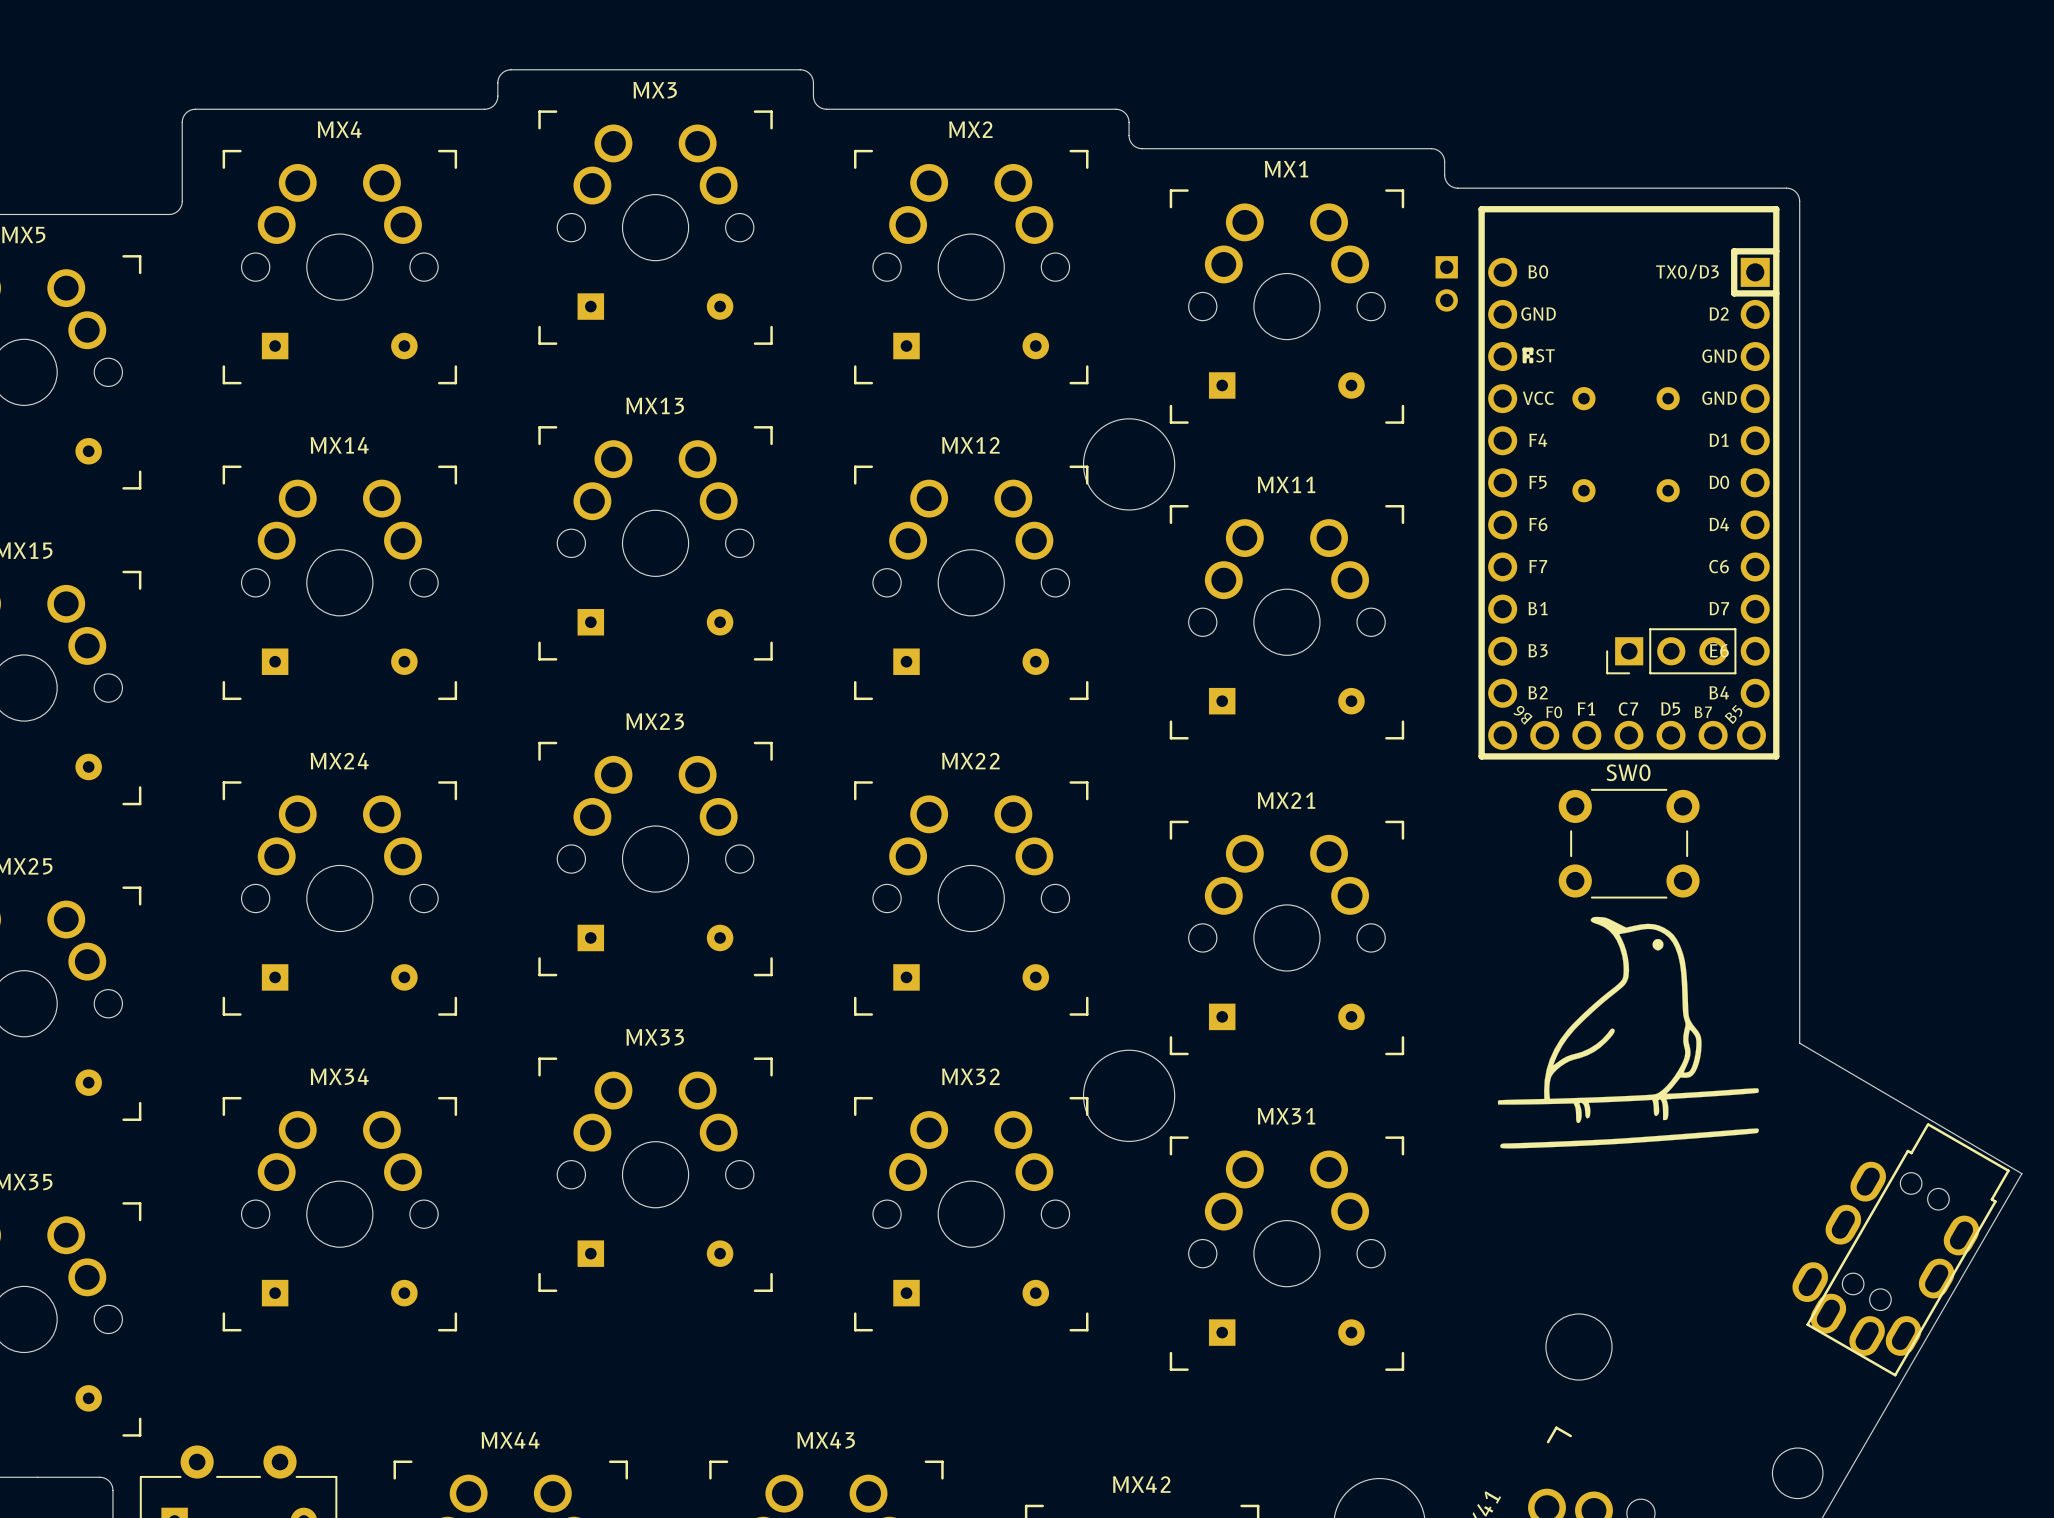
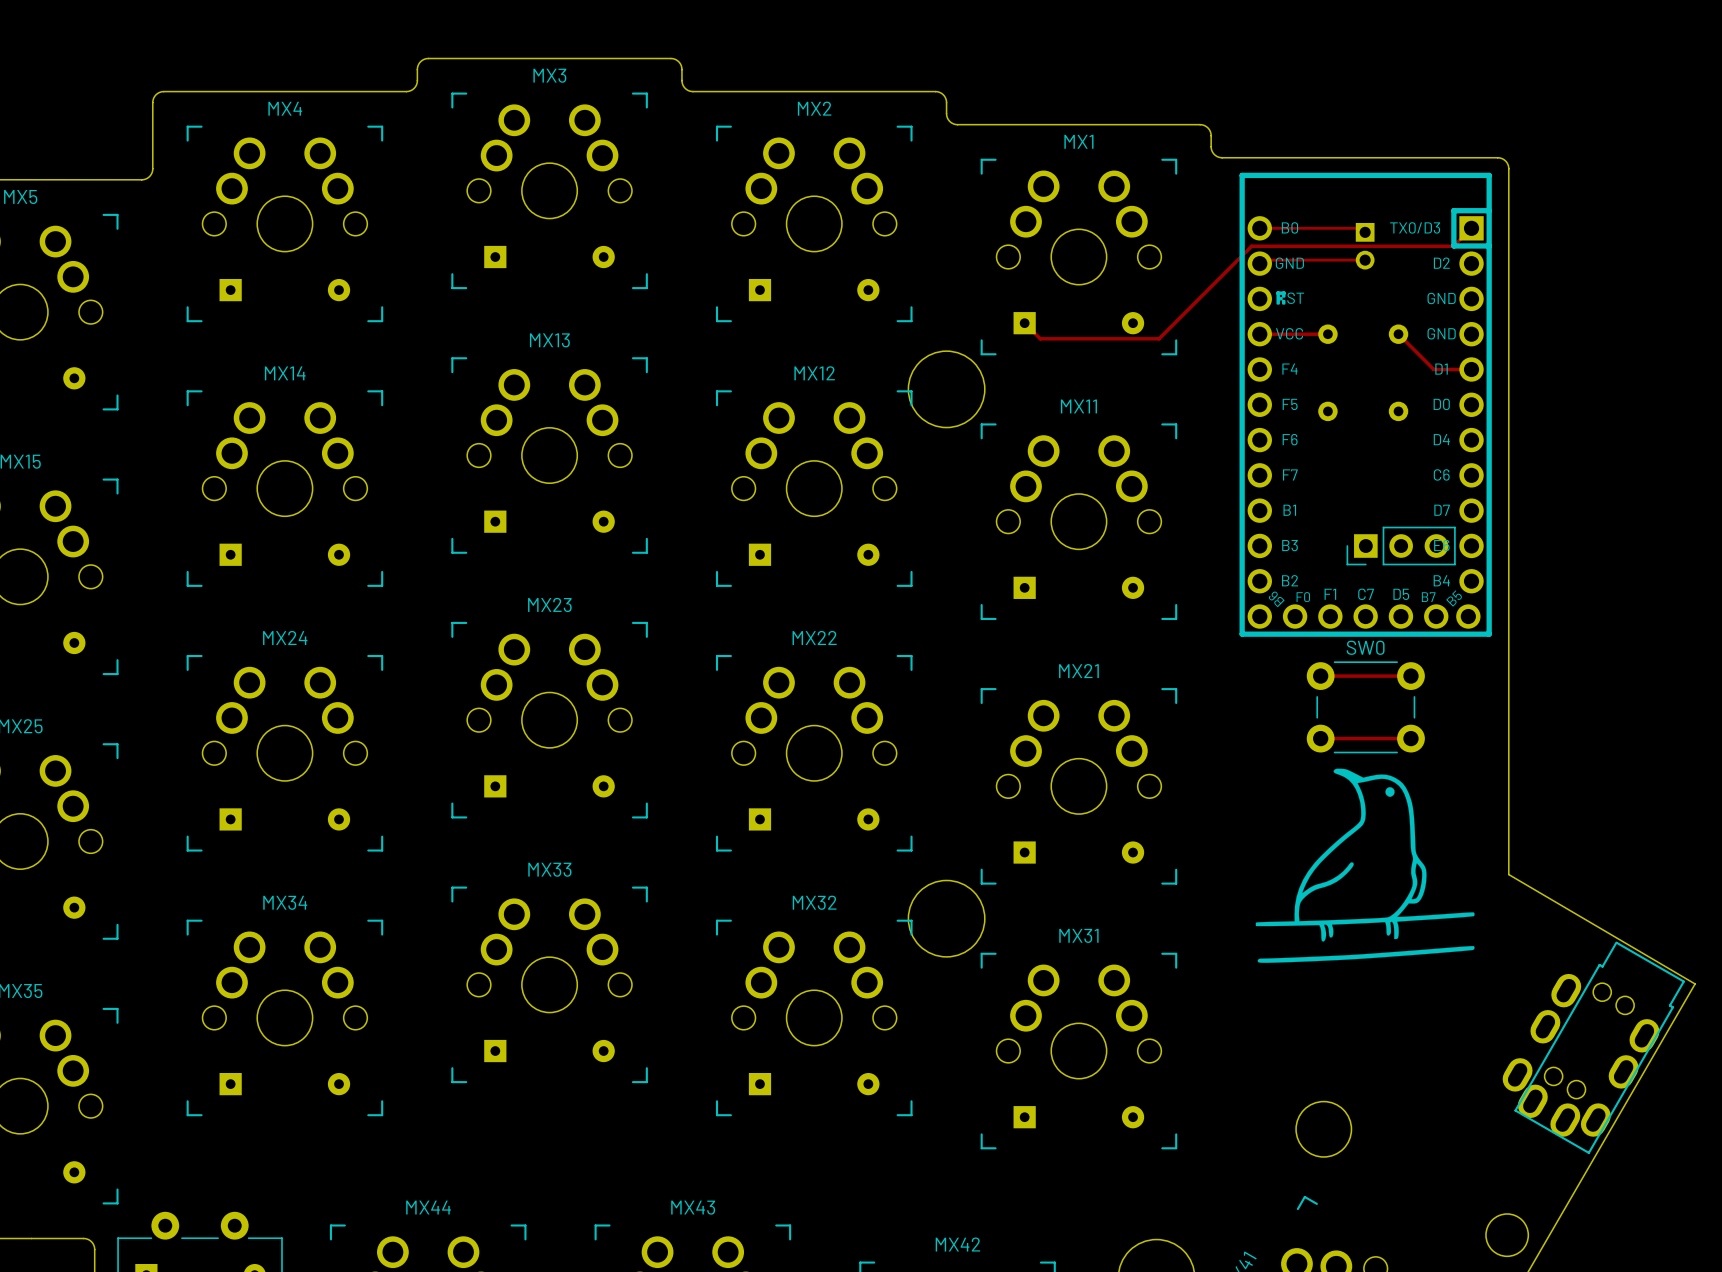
track: none -> (1259, 228) (1361, 228) (1365, 232)
track: none -> (1471, 228) (1453, 246) (1251, 246) (1159, 338) (1040, 338) (1024, 323)
part position: (1446, 283) -> (1365, 246)
track: none -> (1365, 260) (1263, 260) (1259, 263)
track: none -> (1259, 334) (1327, 334)
track: none -> (1398, 334) (1433, 369) (1471, 369)
track: none -> (1320, 676) (1410, 676)
track: none -> (1320, 738) (1410, 738)

